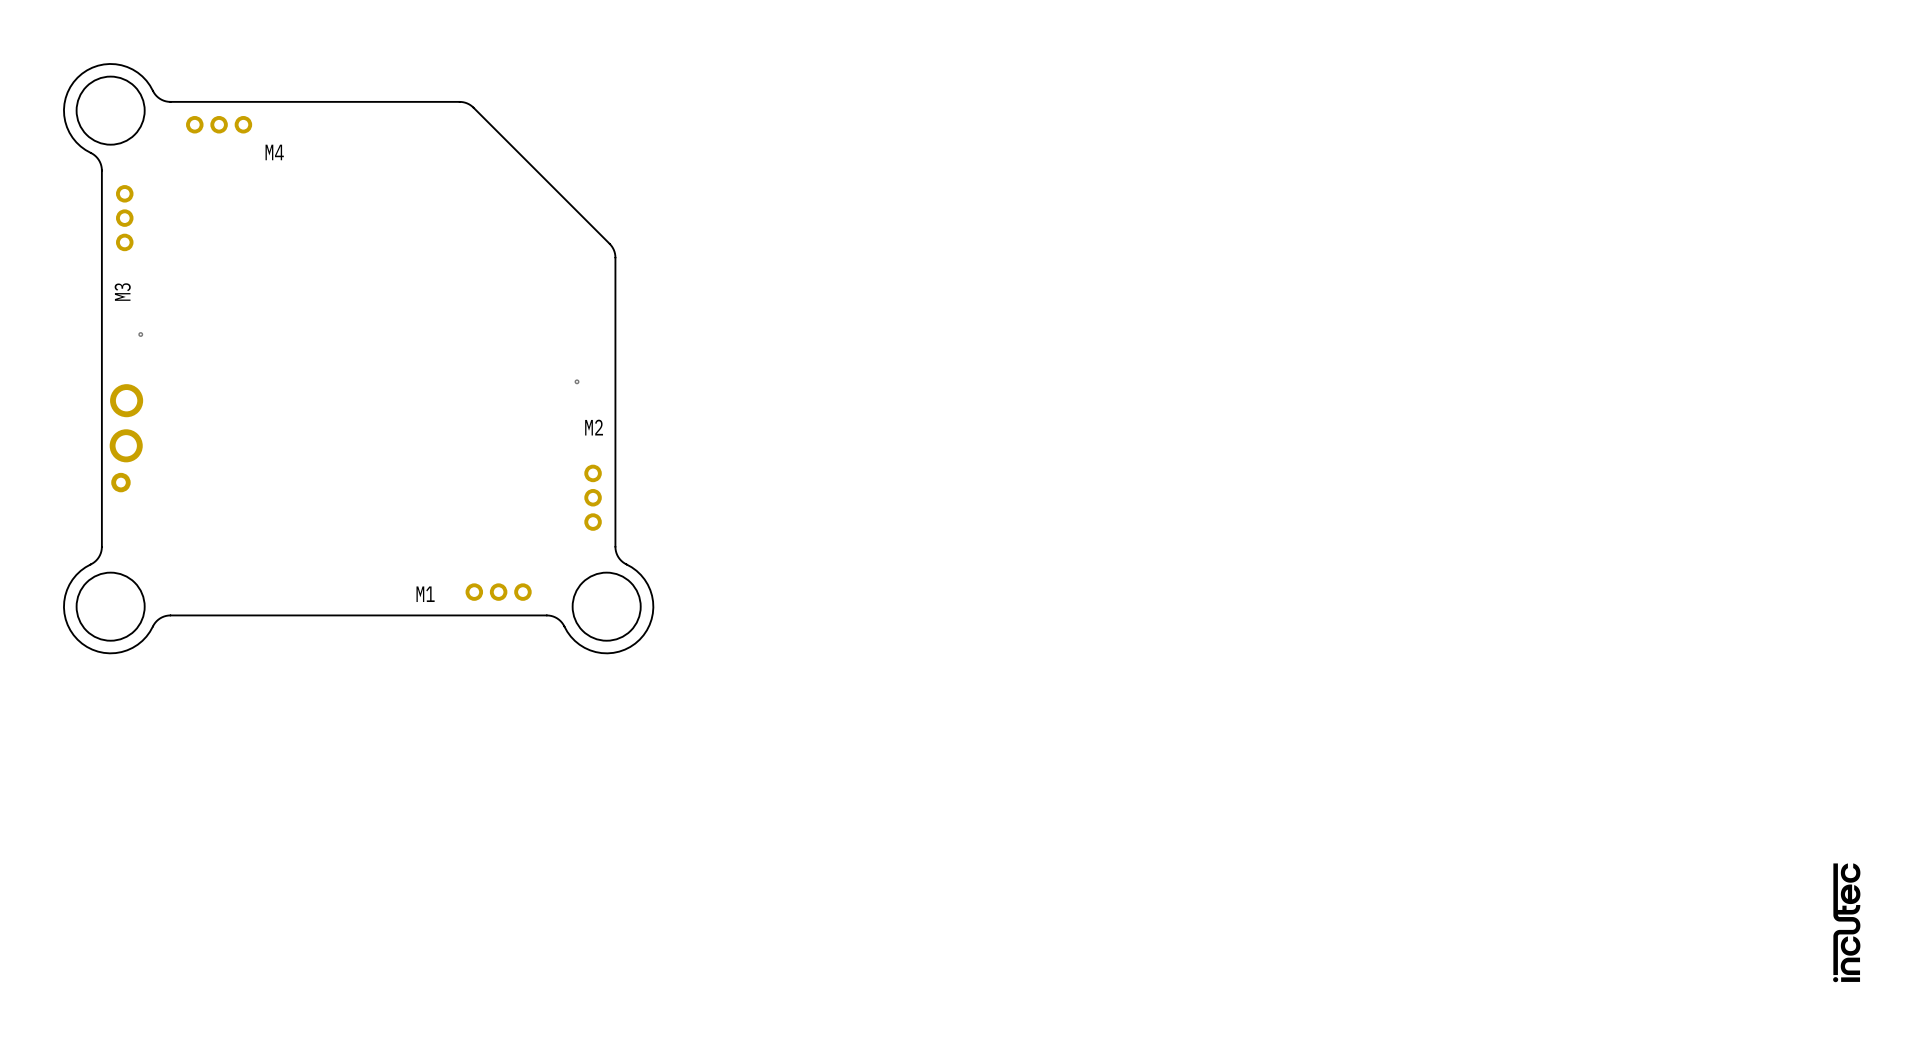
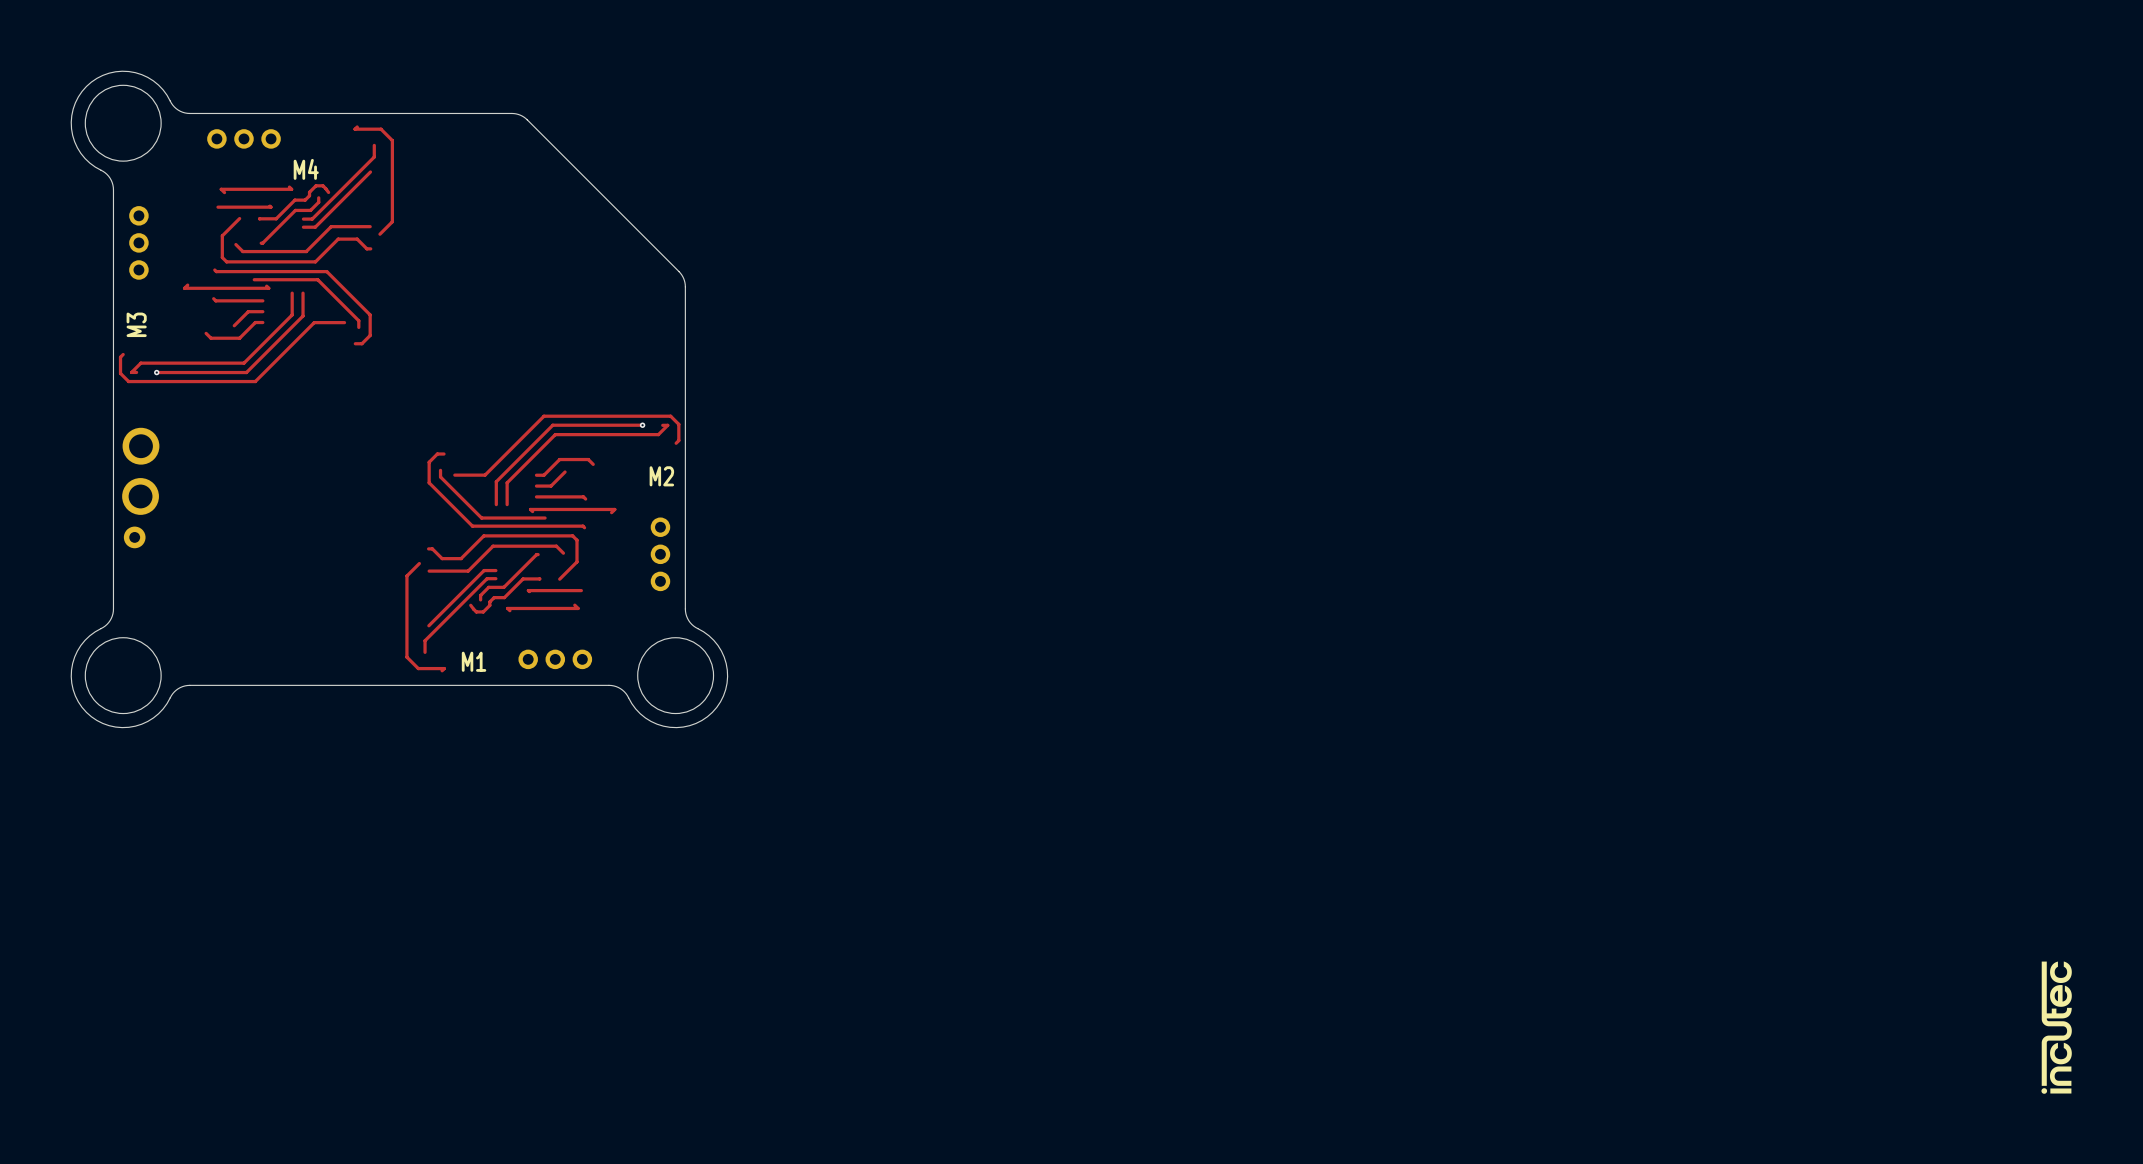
track: none -> (357, 126) (355, 129) (381, 129) (392, 140) (392, 221) (379, 234)
track: none -> (374, 145) (374, 157) (312, 219) (303, 219)
track: none -> (370, 172) (315, 227) (303, 227)
track: none -> (289, 187) (291, 189) (221, 189) (224, 192)
track: none -> (328, 192) (322, 185) (315, 185) (305, 200) (294, 200) (276, 218) (259, 218)
track: none -> (318, 197) (318, 202) (310, 210) (295, 210) (261, 243)
track: none -> (269, 206) (217, 207)
track: none -> (239, 218) (222, 235) (222, 257) (226, 261) (315, 261) (338, 239) (357, 239) (366, 248) (370, 248)
track: none -> (370, 226) (331, 226) (306, 251) (242, 251) (235, 244)
track: none -> (214, 270) (216, 271) (326, 271) (370, 314) (370, 335) (361, 343) (355, 343)
track: none -> (254, 279) (317, 279) (358, 320) (358, 327)
track: none -> (187, 285) (184, 288) (268, 288) (266, 286)
track: none -> (292, 293) (292, 314) (243, 363) (140, 363) (131, 372) (136, 372)
track: none -> (303, 293) (303, 316) (246, 372) (156, 372)
track: none -> (213, 298) (215, 300) (262, 300)
track: none -> (262, 311) (248, 311) (234, 325)
track: none -> (262, 322) (255, 322) (239, 338) (210, 338) (206, 333)
track: none -> (344, 322) (314, 322) (255, 381) (128, 381) (120, 373) (120, 357) (123, 354)
track: none -> (642, 425) (552, 425) (496, 481) (496, 504)
track: none -> (662, 425) (667, 425) (658, 434) (555, 434) (507, 482) (507, 504)
track: none -> (676, 443) (678, 440) (678, 424) (670, 416) (543, 416) (485, 475) (454, 475)
track: none -> (443, 454) (437, 454) (429, 462) (429, 482) (472, 526) (582, 526) (584, 527)
track: none -> (593, 464) (588, 459) (559, 459) (543, 475) (536, 475)
track: none -> (440, 470) (440, 476) (481, 518) (545, 518)
track: none -> (565, 472) (551, 486) (536, 486)
track: none -> (536, 496) (583, 496) (585, 499)
track: none -> (532, 511) (530, 509) (614, 509) (611, 512)
track: none -> (428, 548) (432, 548) (442, 558) (461, 558) (483, 535) (572, 535) (577, 540) (577, 561) (559, 579)
track: none -> (563, 553) (556, 546) (493, 546) (468, 571) (429, 571)
track: none -> (538, 554) (503, 587) (488, 587) (480, 595) (480, 599)
track: none -> (419, 563) (406, 575) (406, 657) (418, 668) (444, 668) (442, 670)
track: none -> (495, 570) (484, 570) (428, 625)
track: none -> (495, 578) (487, 578) (425, 640) (425, 652)
track: none -> (539, 578) (523, 578) (504, 597) (494, 597) (483, 611) (476, 611) (470, 605)
track: none -> (581, 590) (529, 591)
track: none -> (574, 605) (578, 608) (507, 608) (509, 610)

